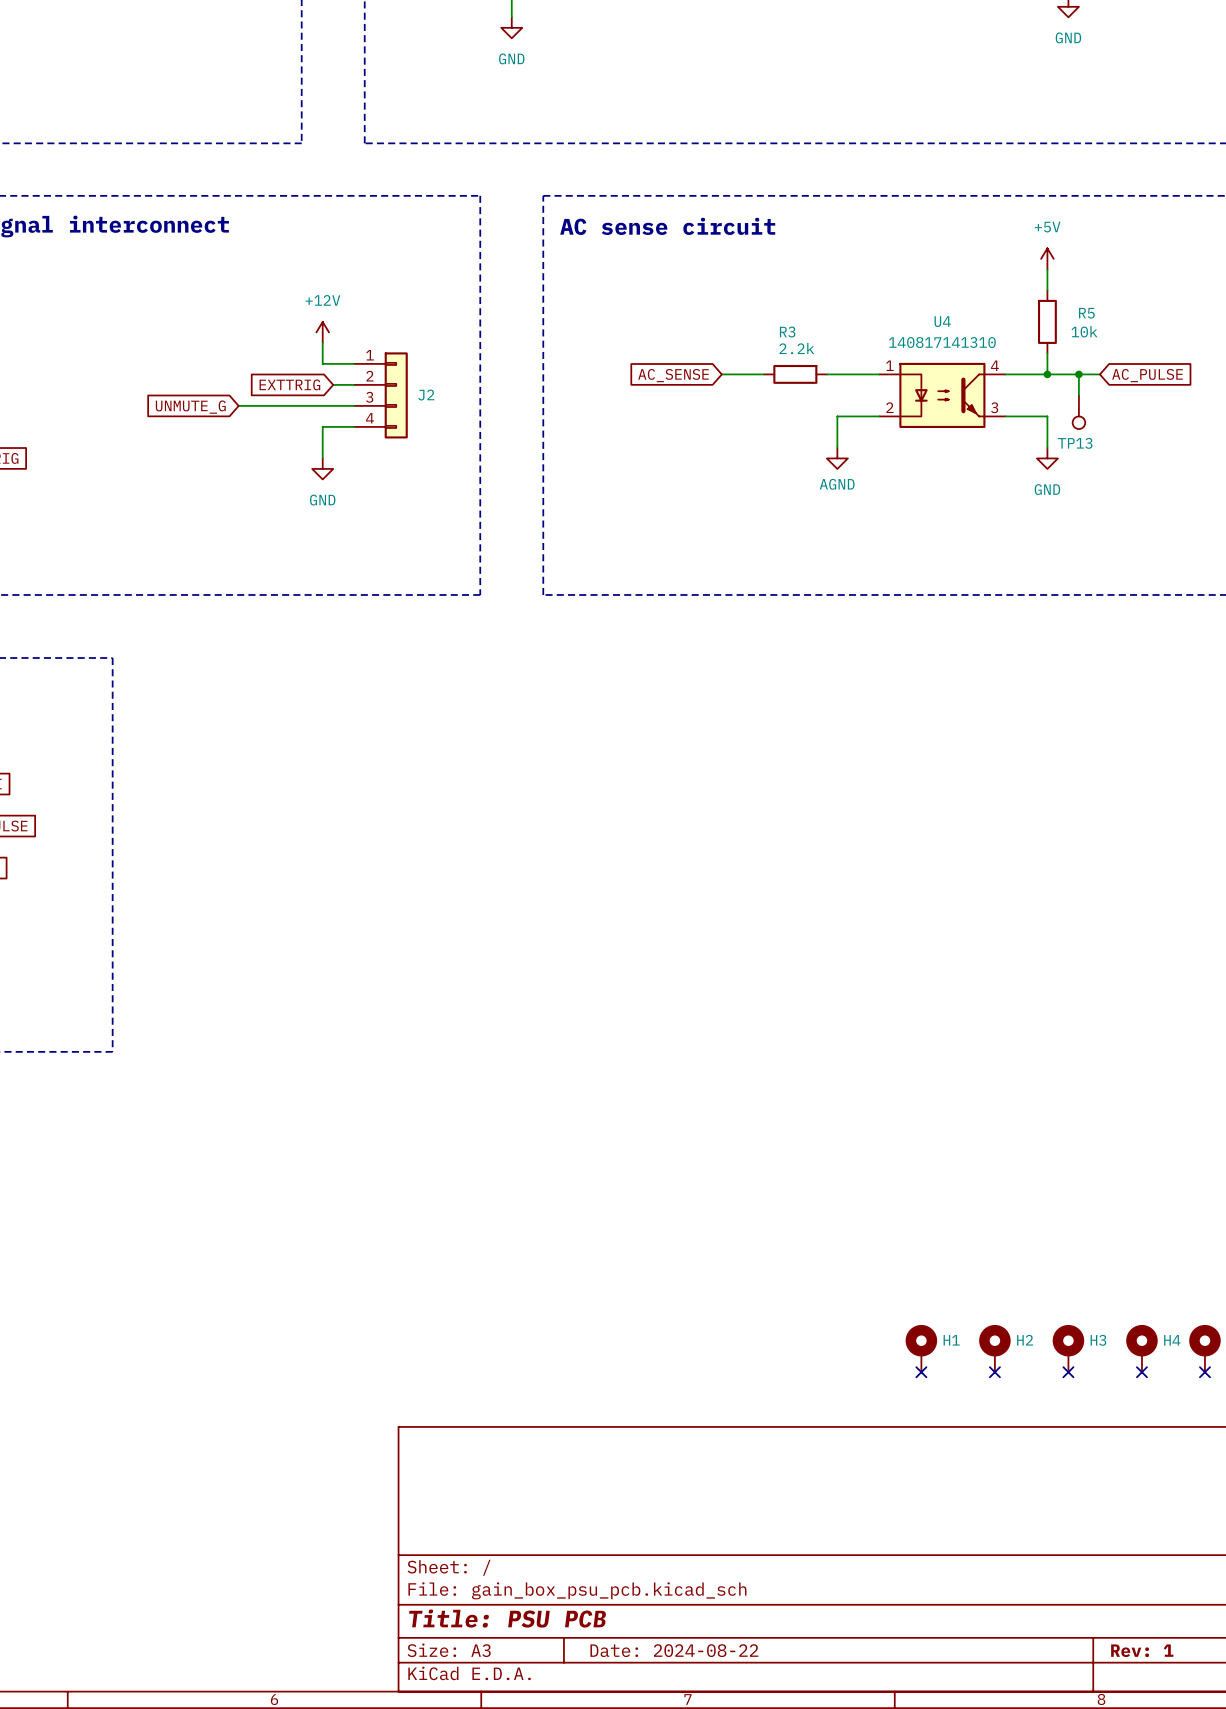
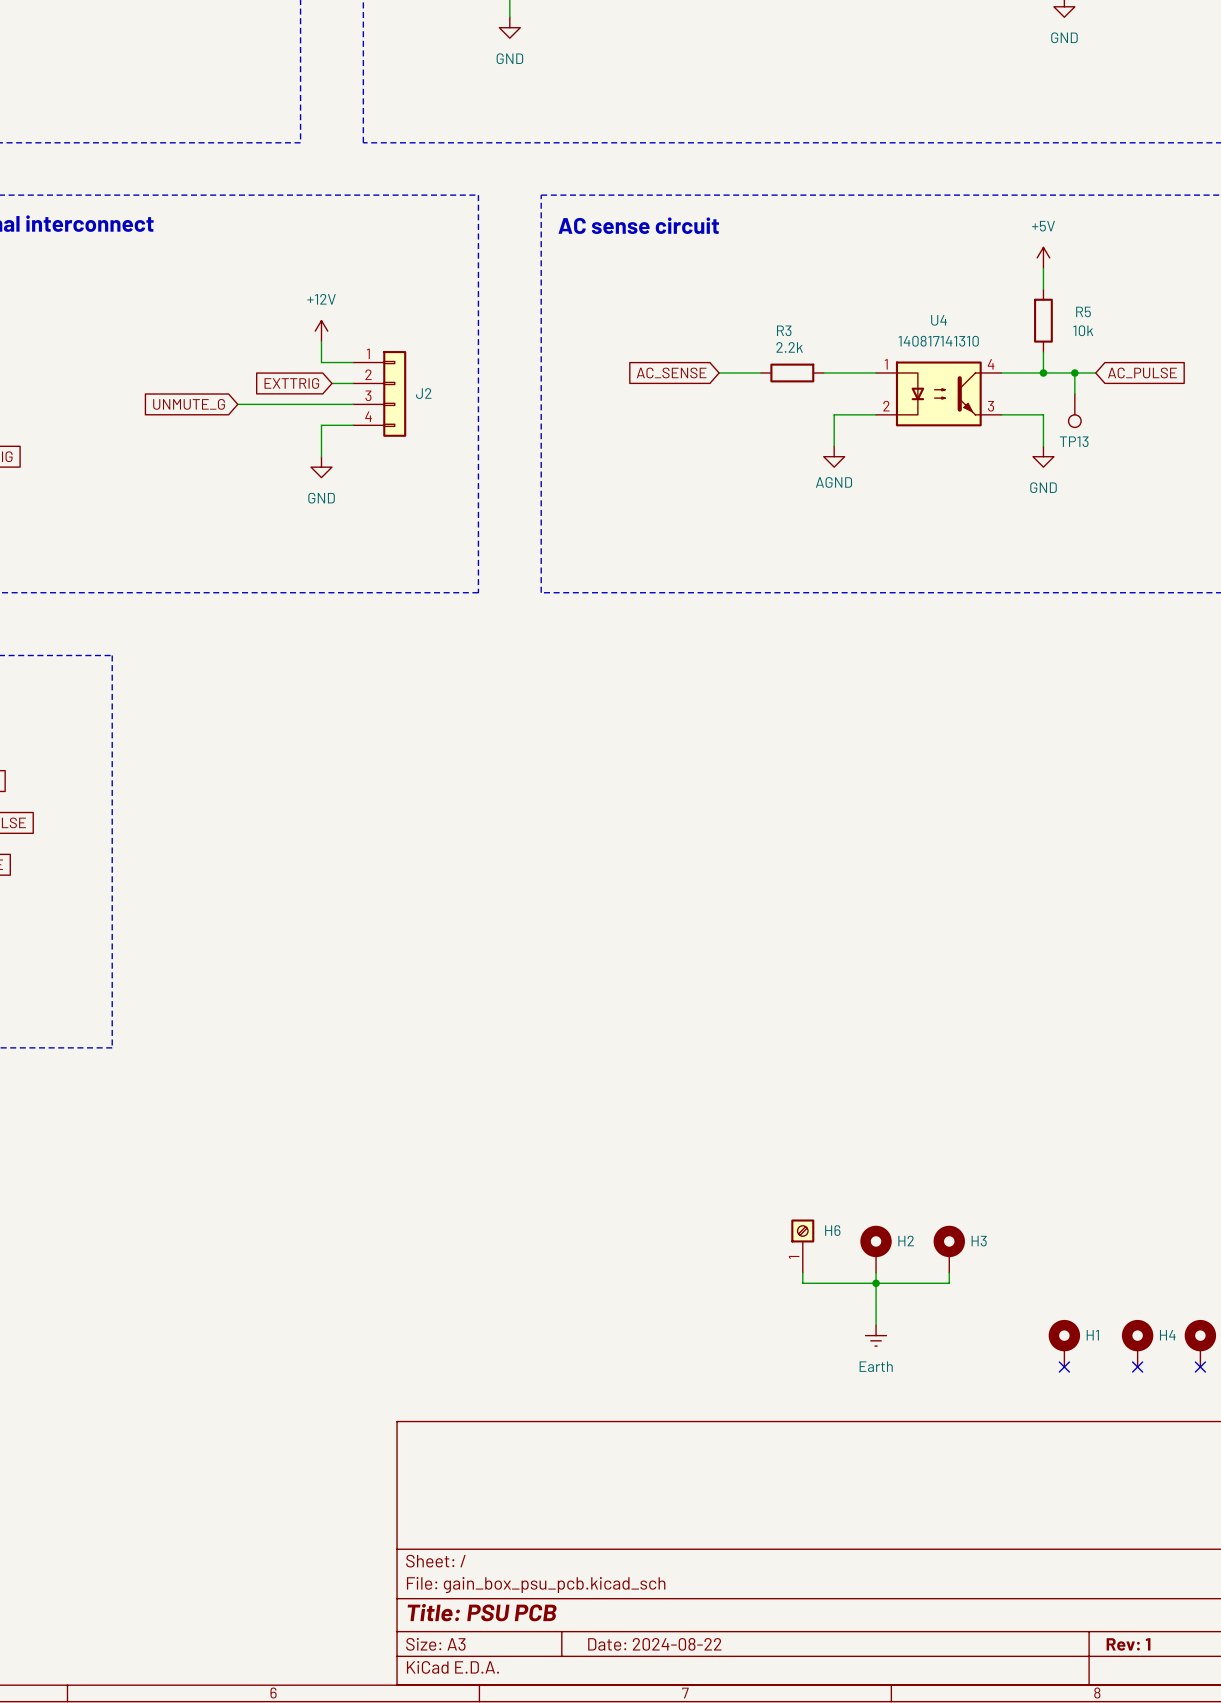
H6: none -> (802, 1246)
H3: none -> (949, 1249)
wire: none -> (802, 1272) (802, 1283) (949, 1283) (949, 1272)
wire: none -> (876, 1272) (876, 1325)
junction: none -> (876, 1283)
power symbol: none -> Earth (876, 1335)
H3 name: H3 (1098, 1340) -> H1 (1092, 1335)
H1: (921, 1348) -> none
H2 position: (994, 1348) -> (876, 1249)
no-connect mark: (921, 1372) -> none
no-connect mark: (994, 1372) -> none

